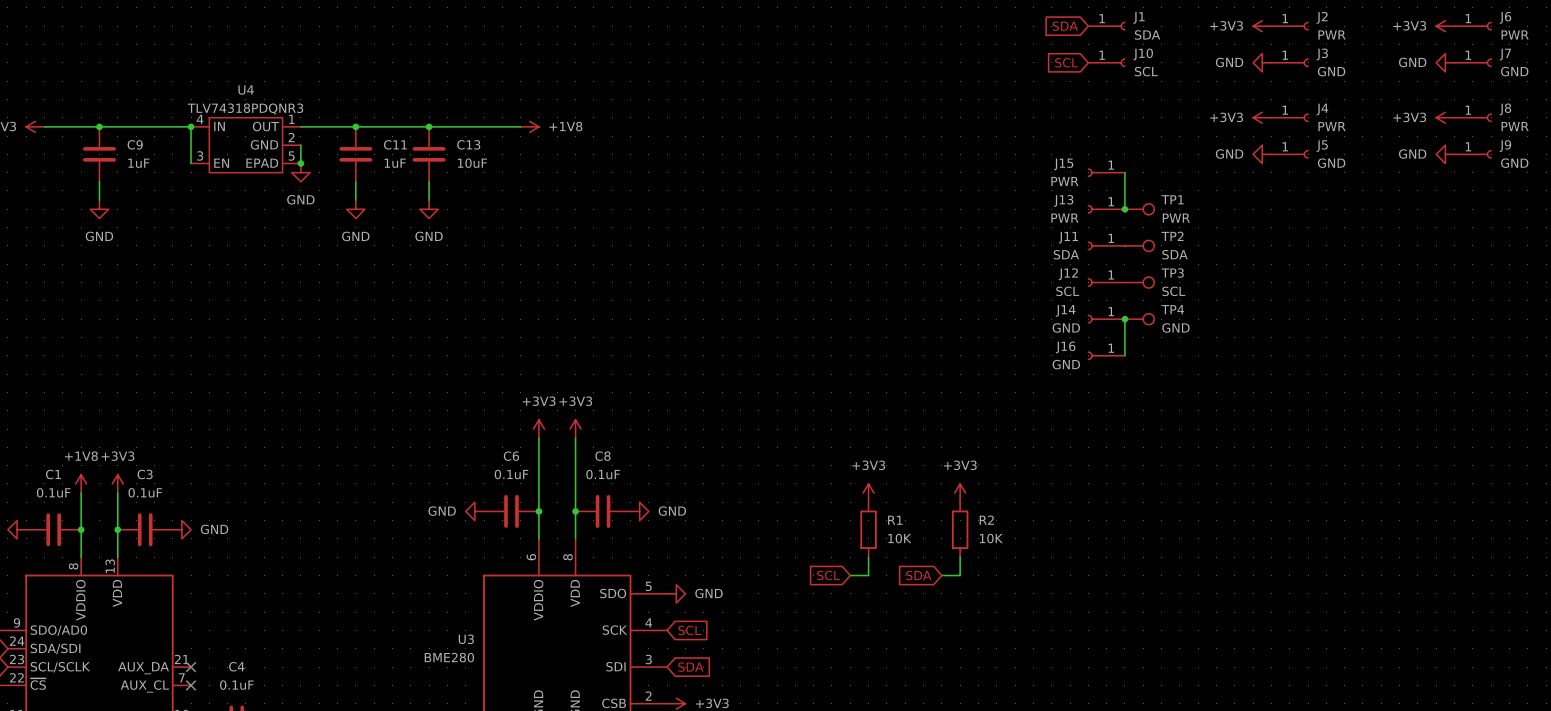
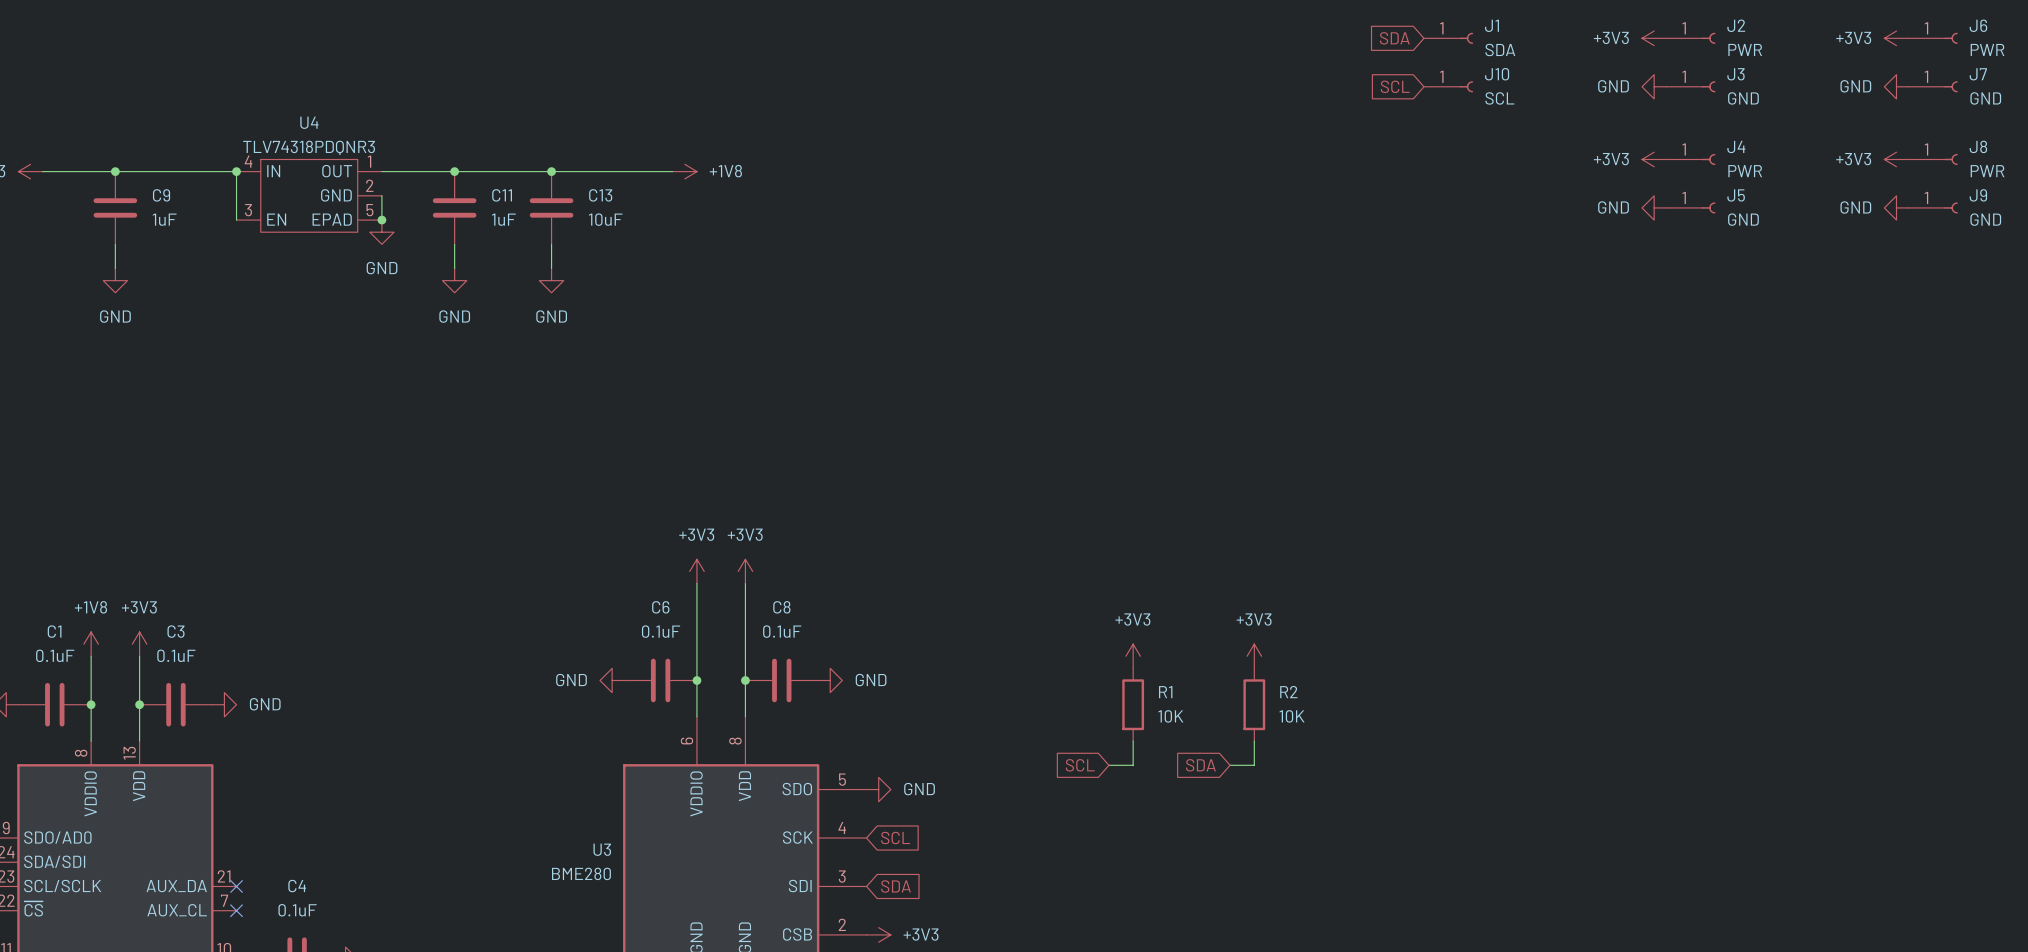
J15: PWR (1106, 172) -> none
wire: (1124, 172) (1124, 209) -> none
J13: PWR (1106, 209) -> none
junction: (1124, 209) -> none
TP1: PWR (1139, 209) -> none
J11: SDA (1106, 245) -> none
TP2: SDA (1139, 245) -> none
J12: SCL (1106, 282) -> none
TP3: SCL (1139, 282) -> none
J14: GND (1106, 319) -> none
wire: (1124, 319) (1124, 355) -> none
junction: (1124, 319) -> none
TP4: GND (1139, 319) -> none
J16: GND (1106, 355) -> none

